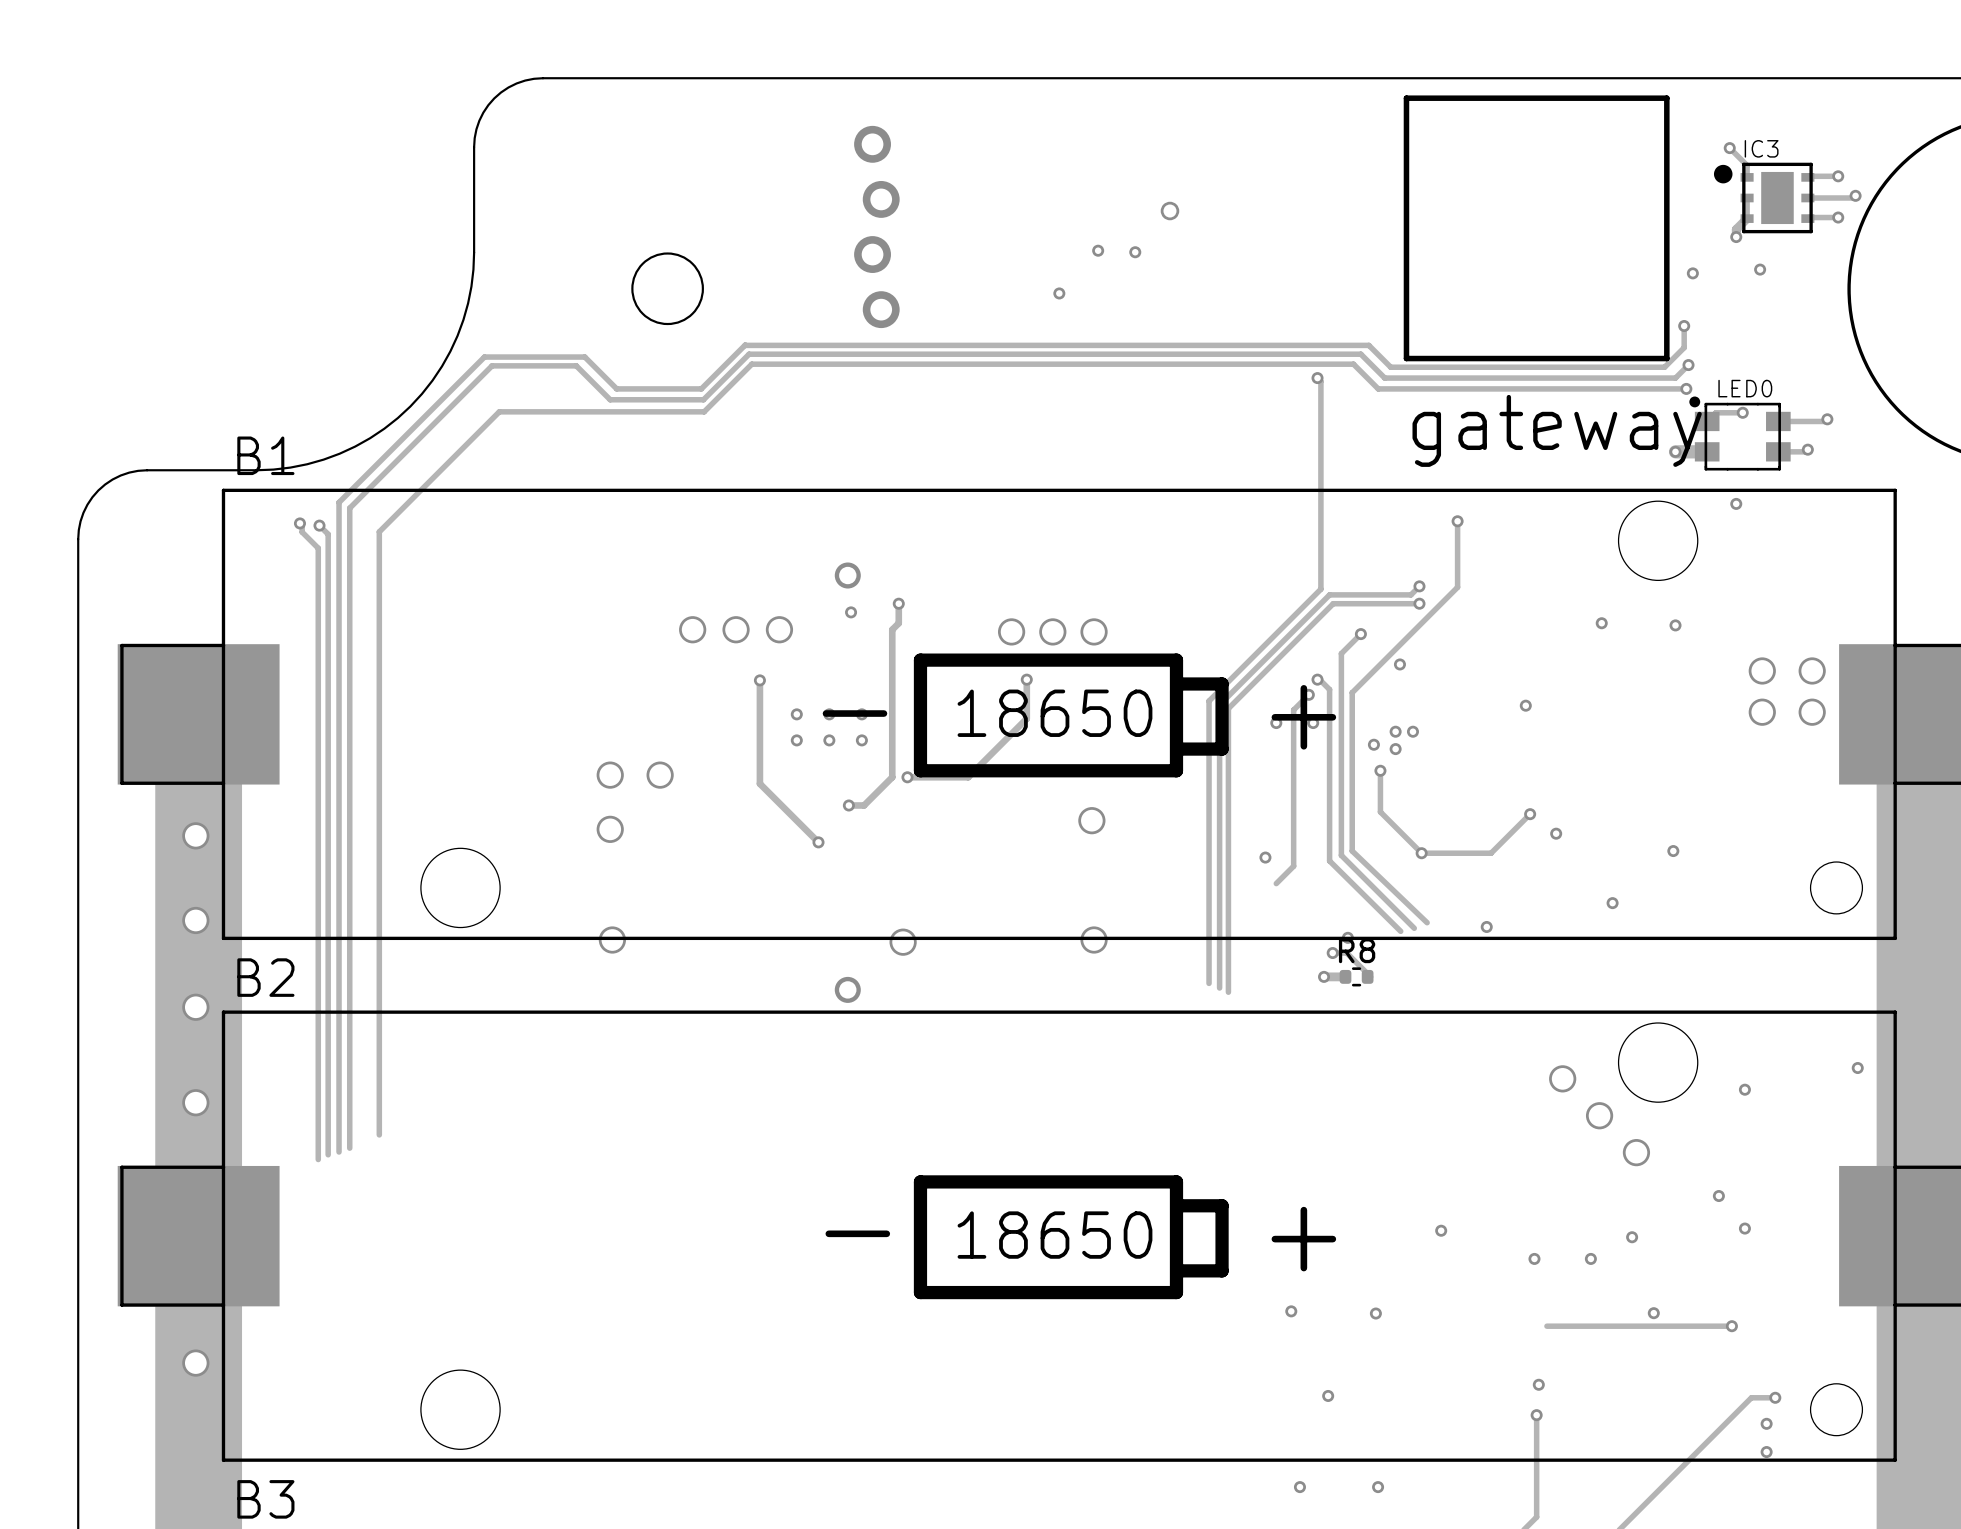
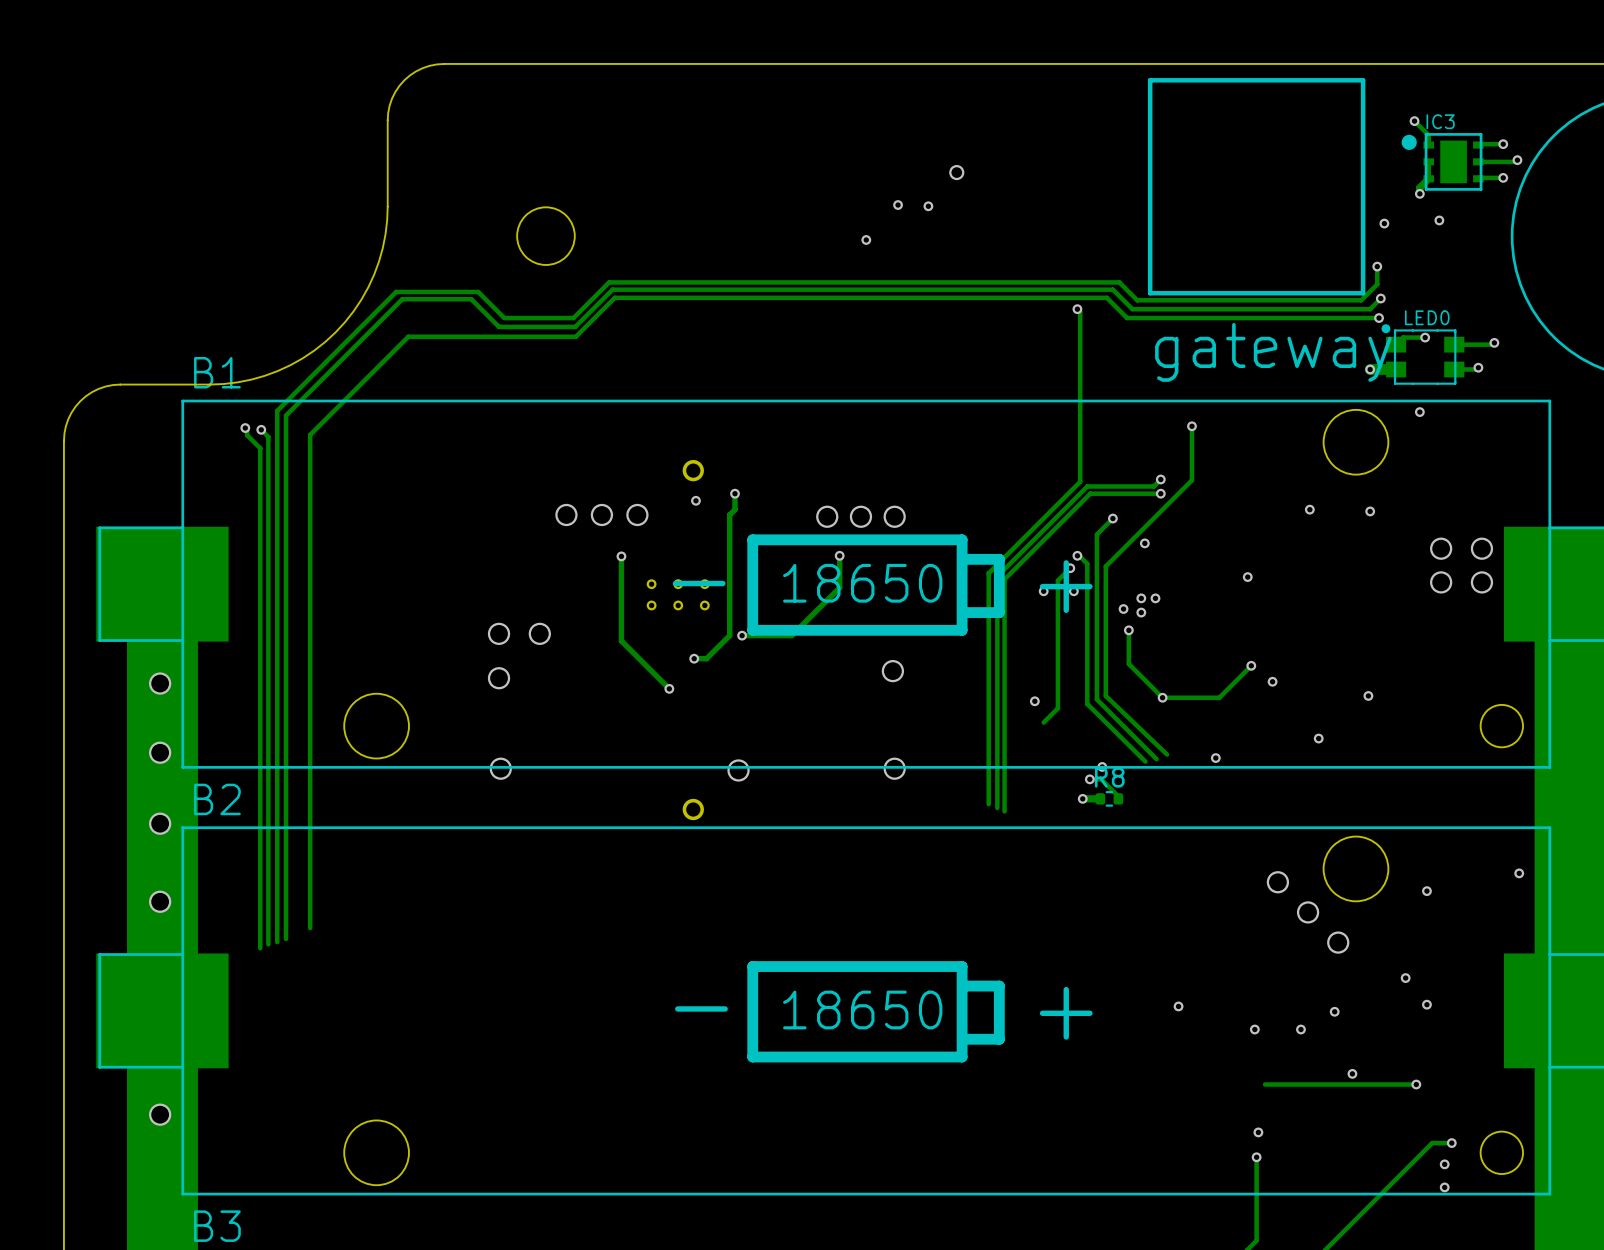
part: (876, 226) -> none
via: (1291, 1311) -> none
via: (1375, 1313) -> none
via: (1328, 1395) -> none
via: (1299, 1487) -> none
via: (1378, 1487) -> none

